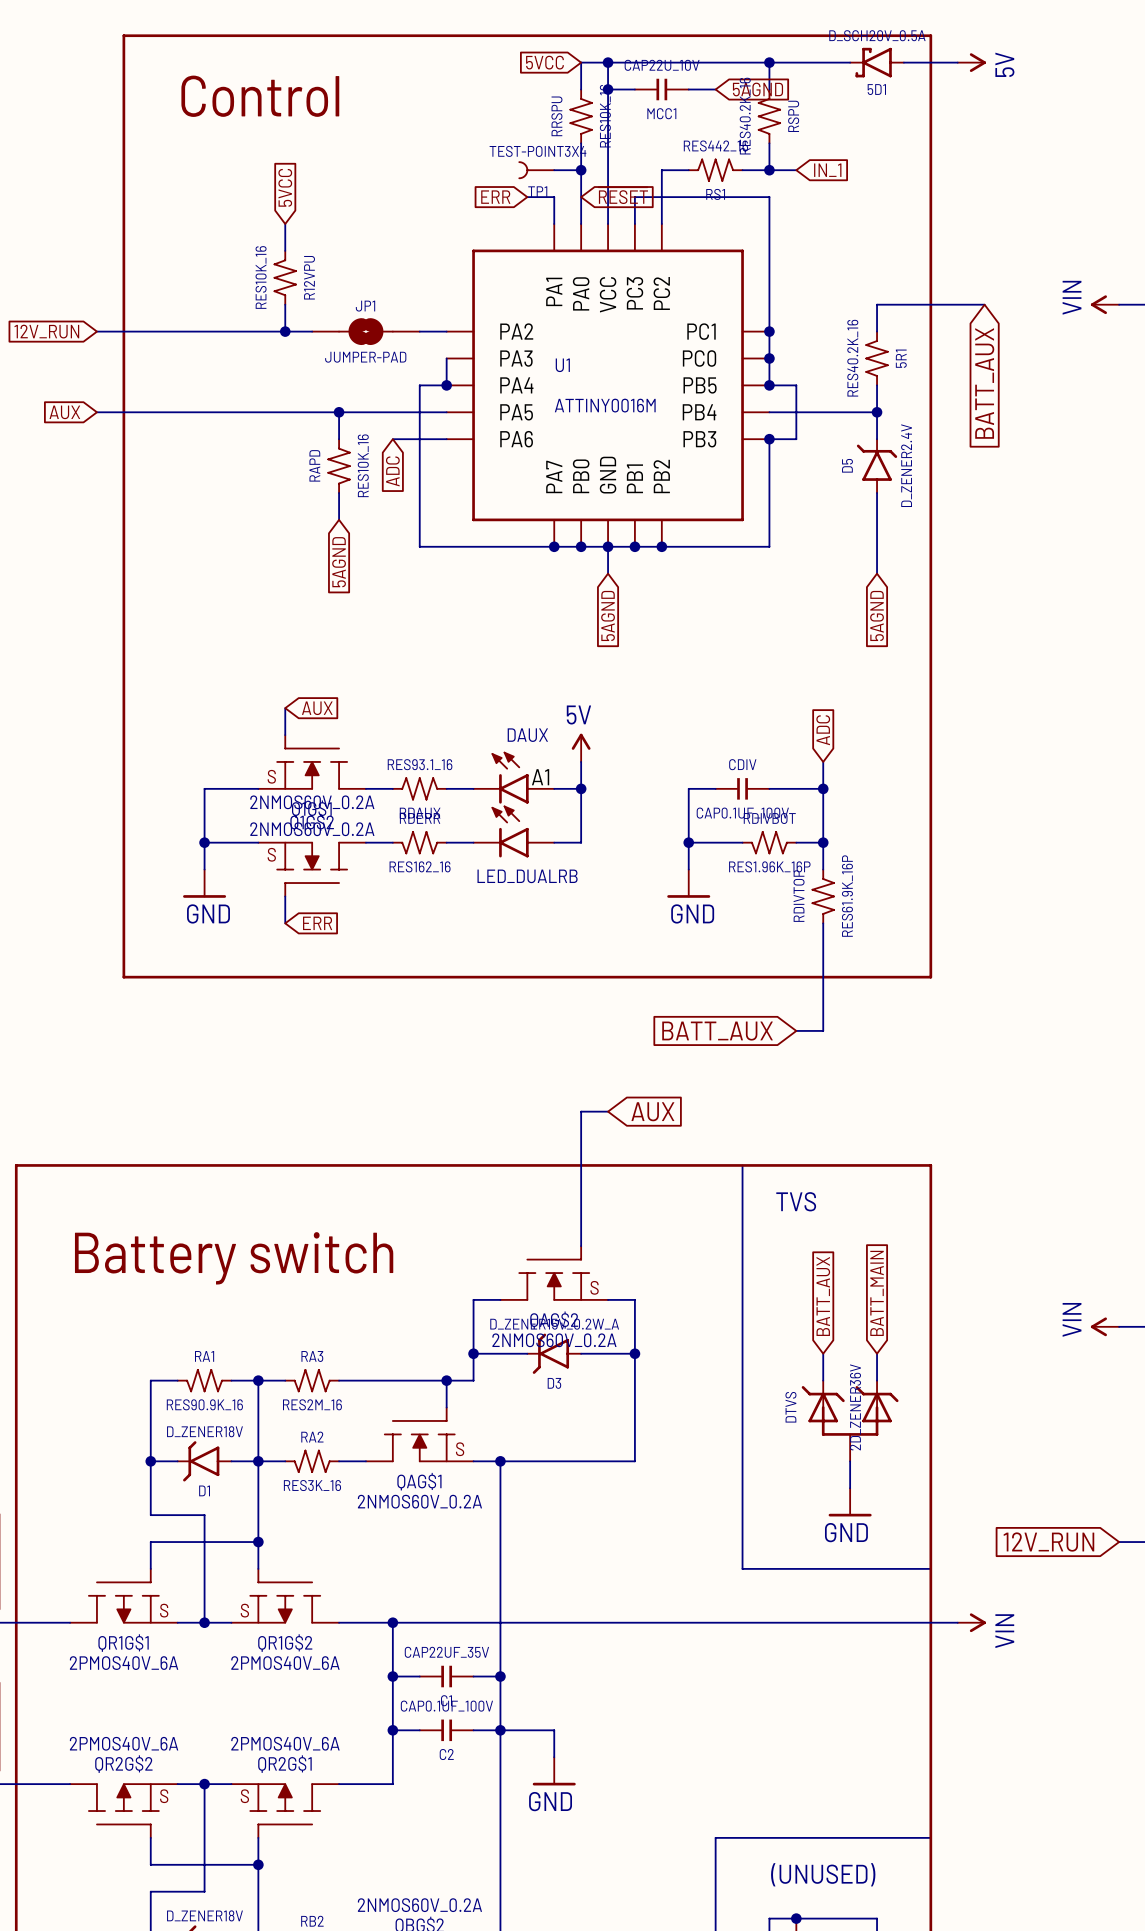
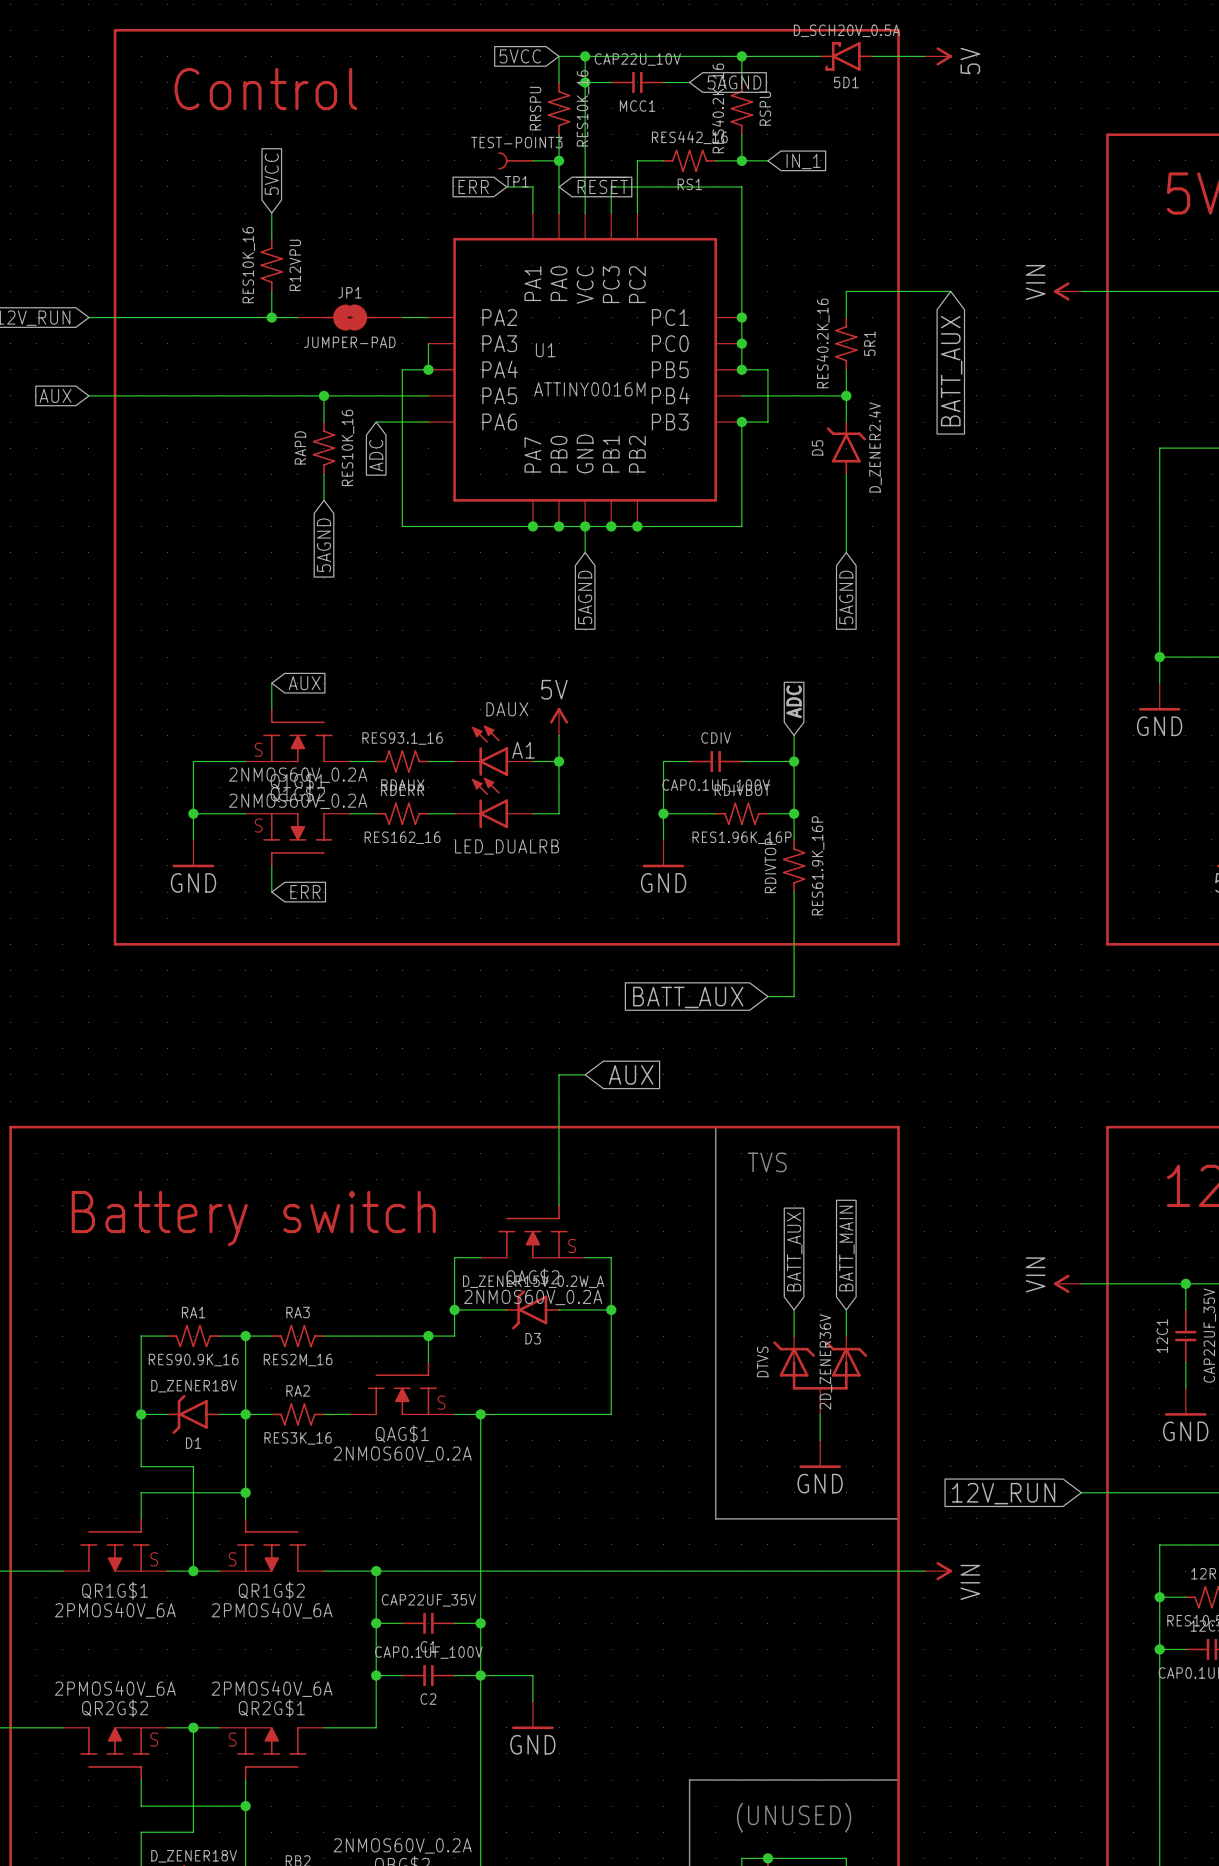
TP1 value: TEST-POINT3X4 (537, 151) -> TEST-POINT3 (516, 142)

